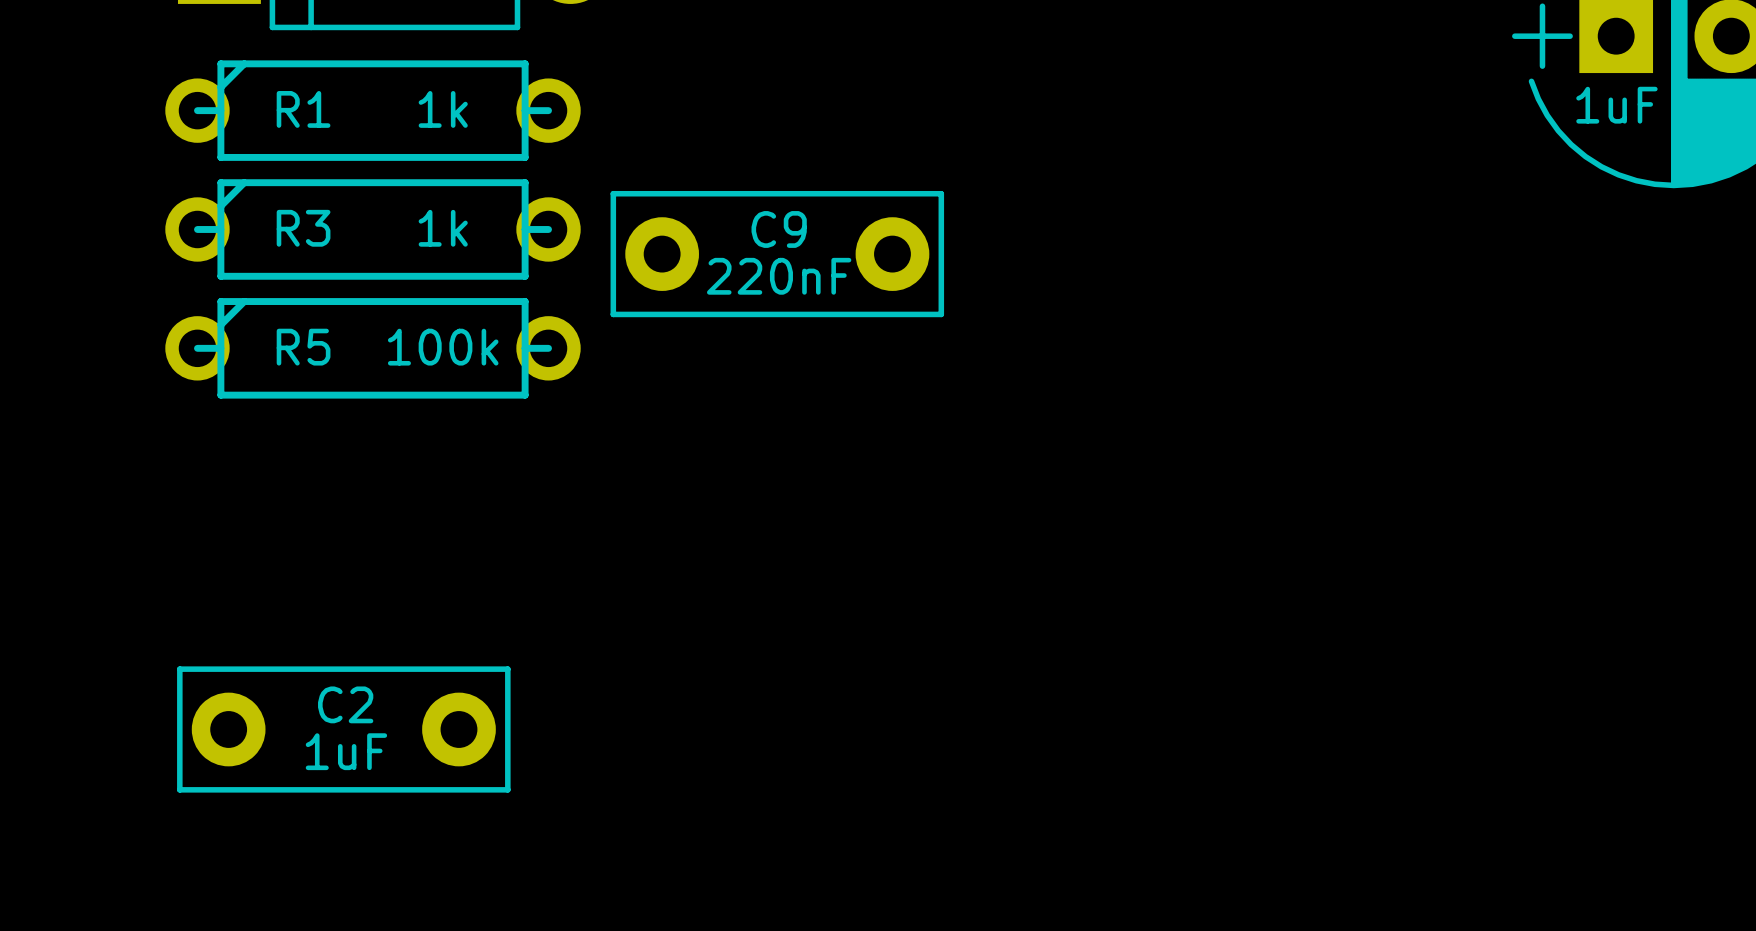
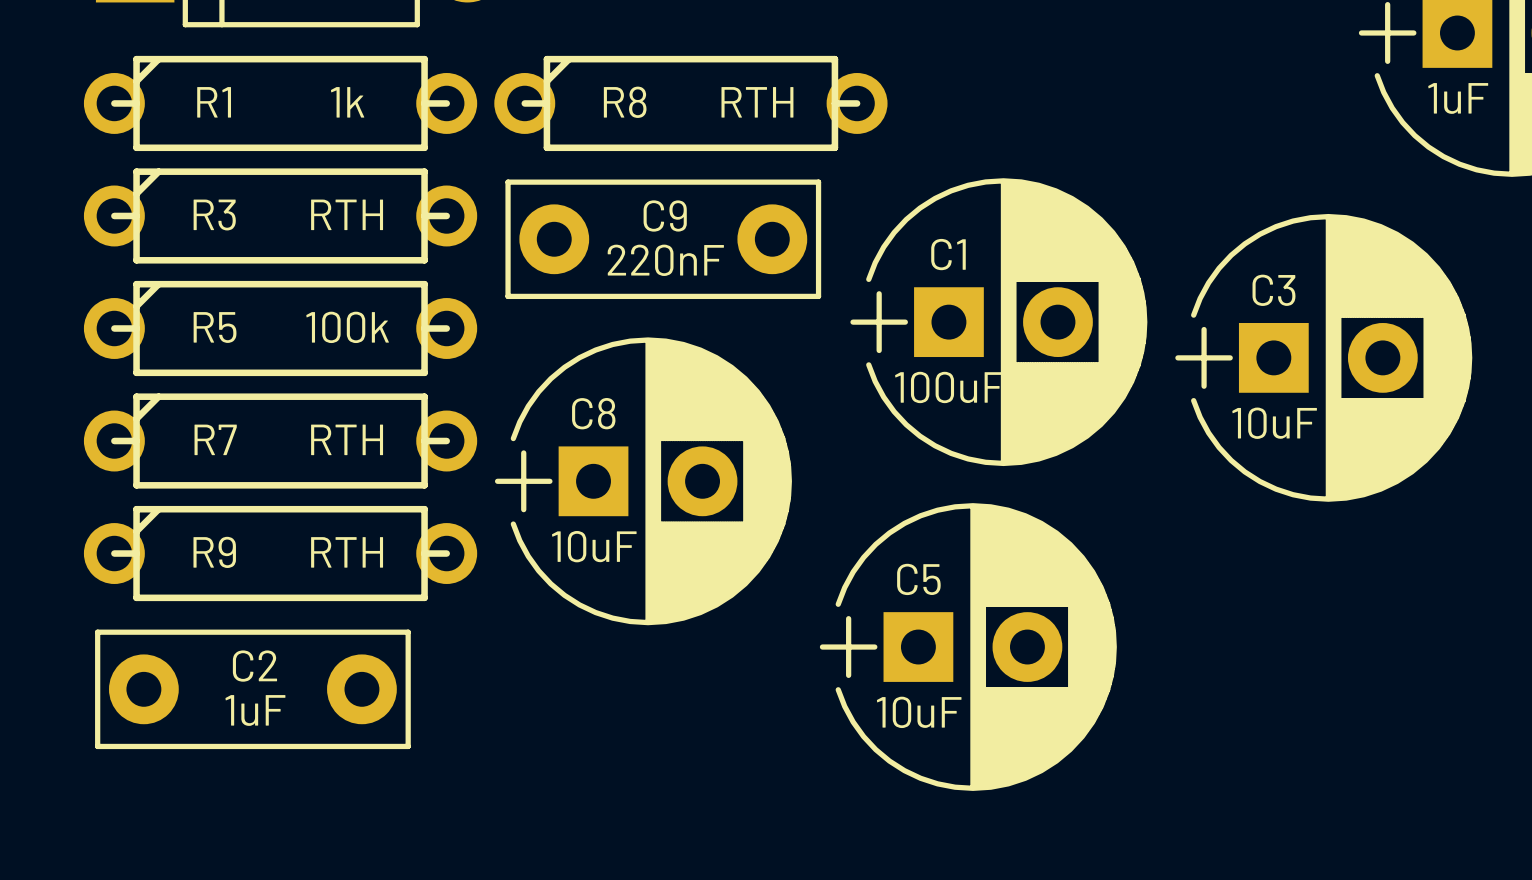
R8: none -> RTH (690, 103)
R3 value: 1k (443, 228) -> RTH (347, 214)
C1: none -> 100uF (998, 322)
C3: none -> 10uF (1323, 357)
R7: none -> RTH (280, 441)
C8: none -> 10uF (643, 481)
R9: none -> RTH (280, 553)
C5: none -> 10uF (968, 647)

